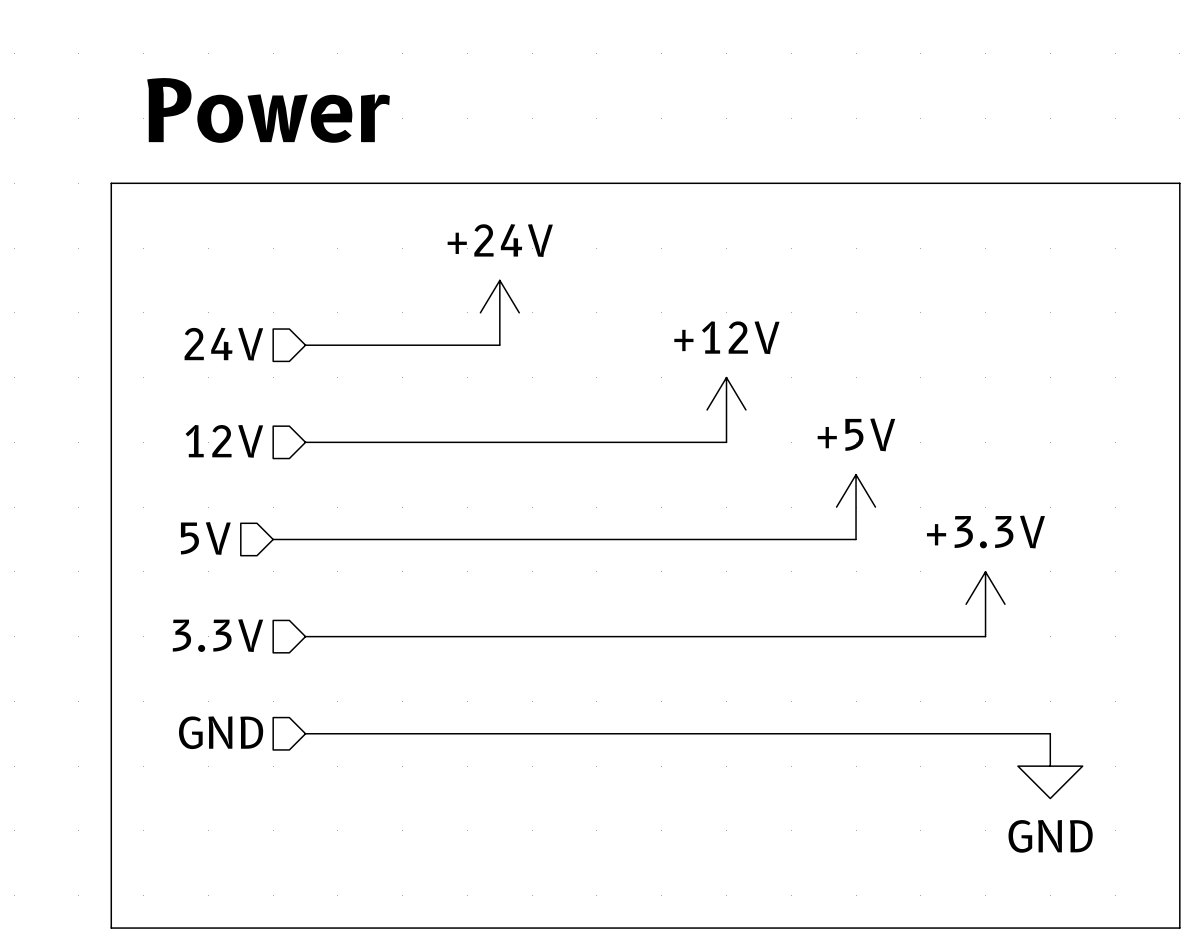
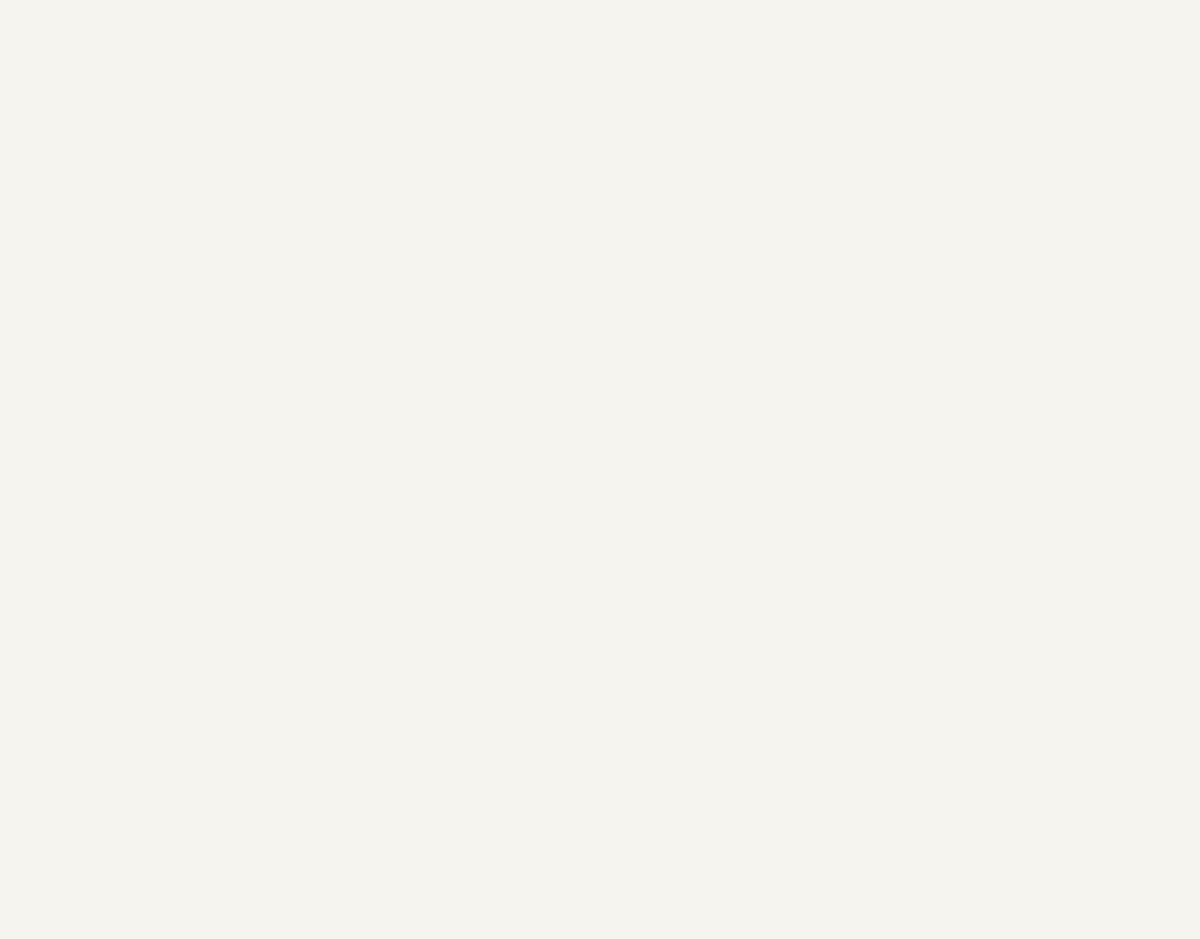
text: Power (268, 110) -> none
line: (111, 183) (1179, 183) (1179, 928) (111, 928) (111, 183) -> none
power symbol: +24V (499, 312) -> none
hierarchical label: 24V (223, 344) -> none
wire: (305, 345) (499, 345) -> none
power symbol: +12V (726, 409) -> none
hierarchical label: 12V (224, 441) -> none
wire: (305, 442) (726, 442) -> none
power symbol: +5V (856, 507) -> none
hierarchical label: 5V (205, 538) -> none
wire: (273, 539) (856, 539) -> none
power symbol: +3.3V (985, 604) -> none
hierarchical label: 3.3V (218, 635) -> none
wire: (305, 636) (985, 636) -> none
hierarchical label: GND (221, 732) -> none
wire: (305, 733) (1050, 733) -> none
power symbol: GND (1050, 766) -> none

